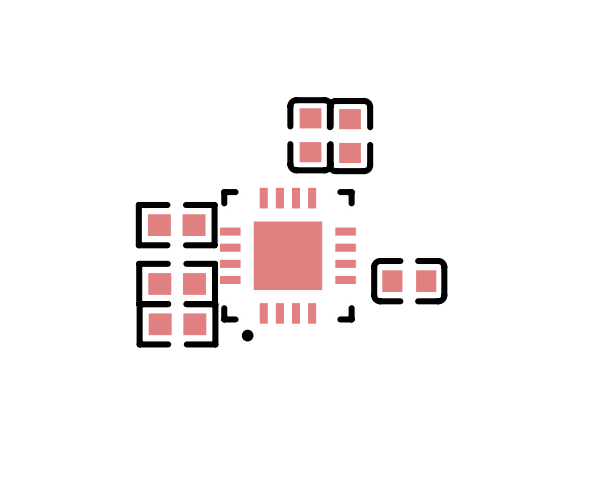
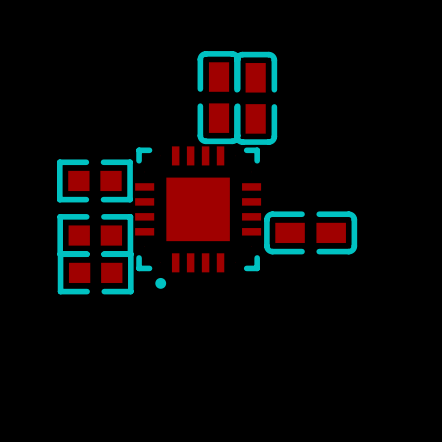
part footprint: [287, 97, 334, 174] -> [197, 51, 241, 145]
part footprint: [326, 97, 374, 175] -> [234, 51, 278, 145]
part footprint: [371, 257, 448, 305] -> [264, 211, 358, 255]

